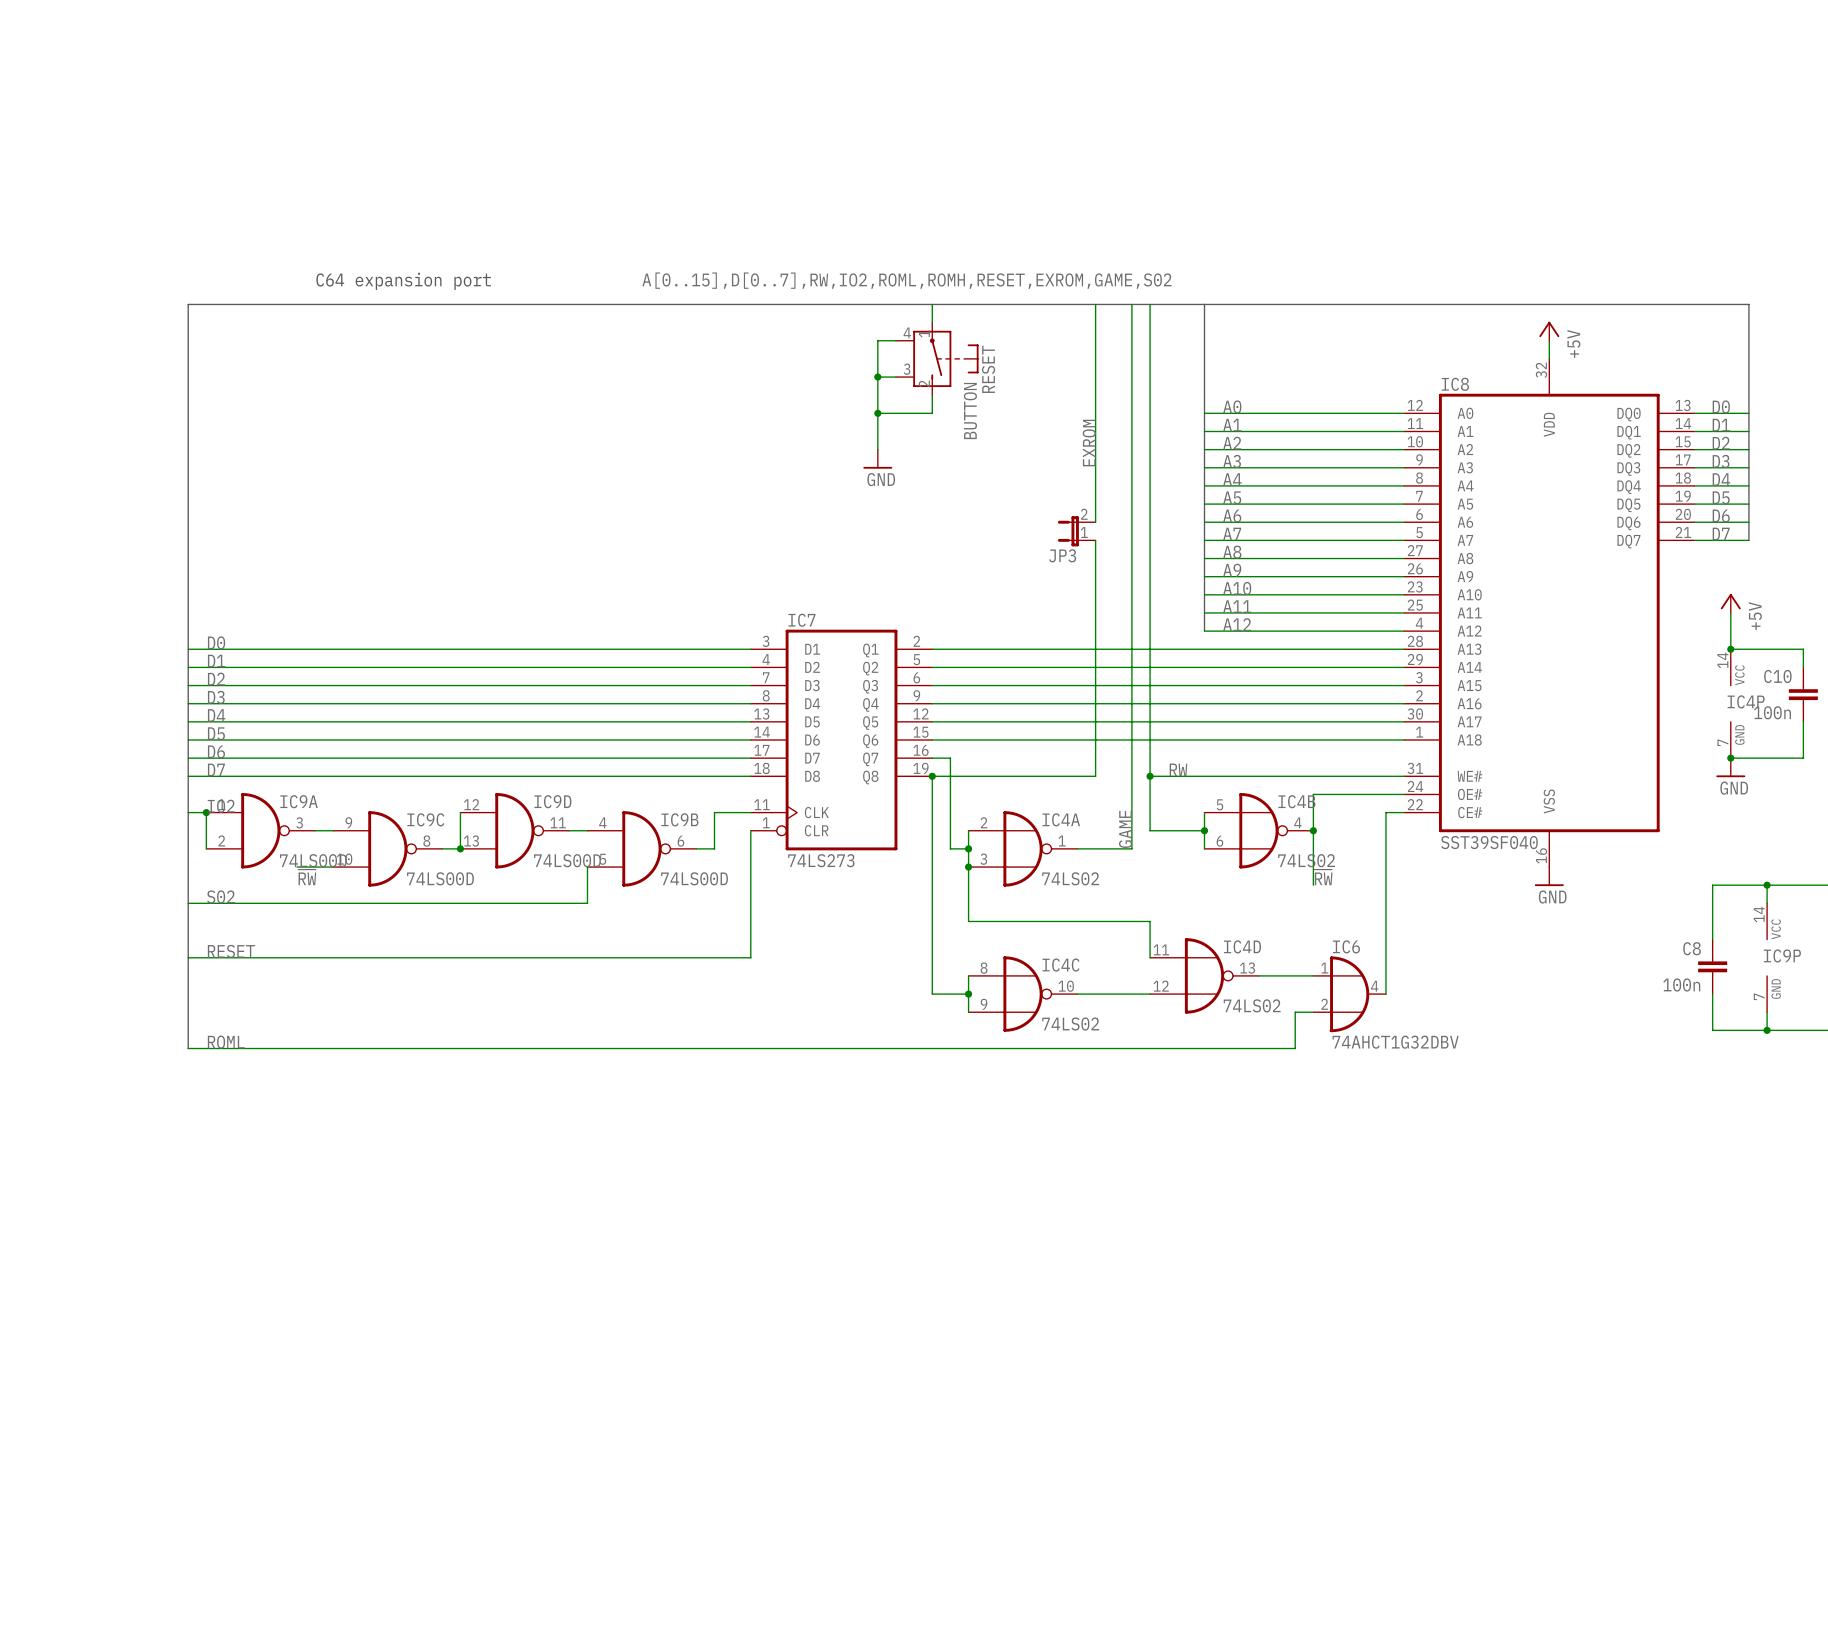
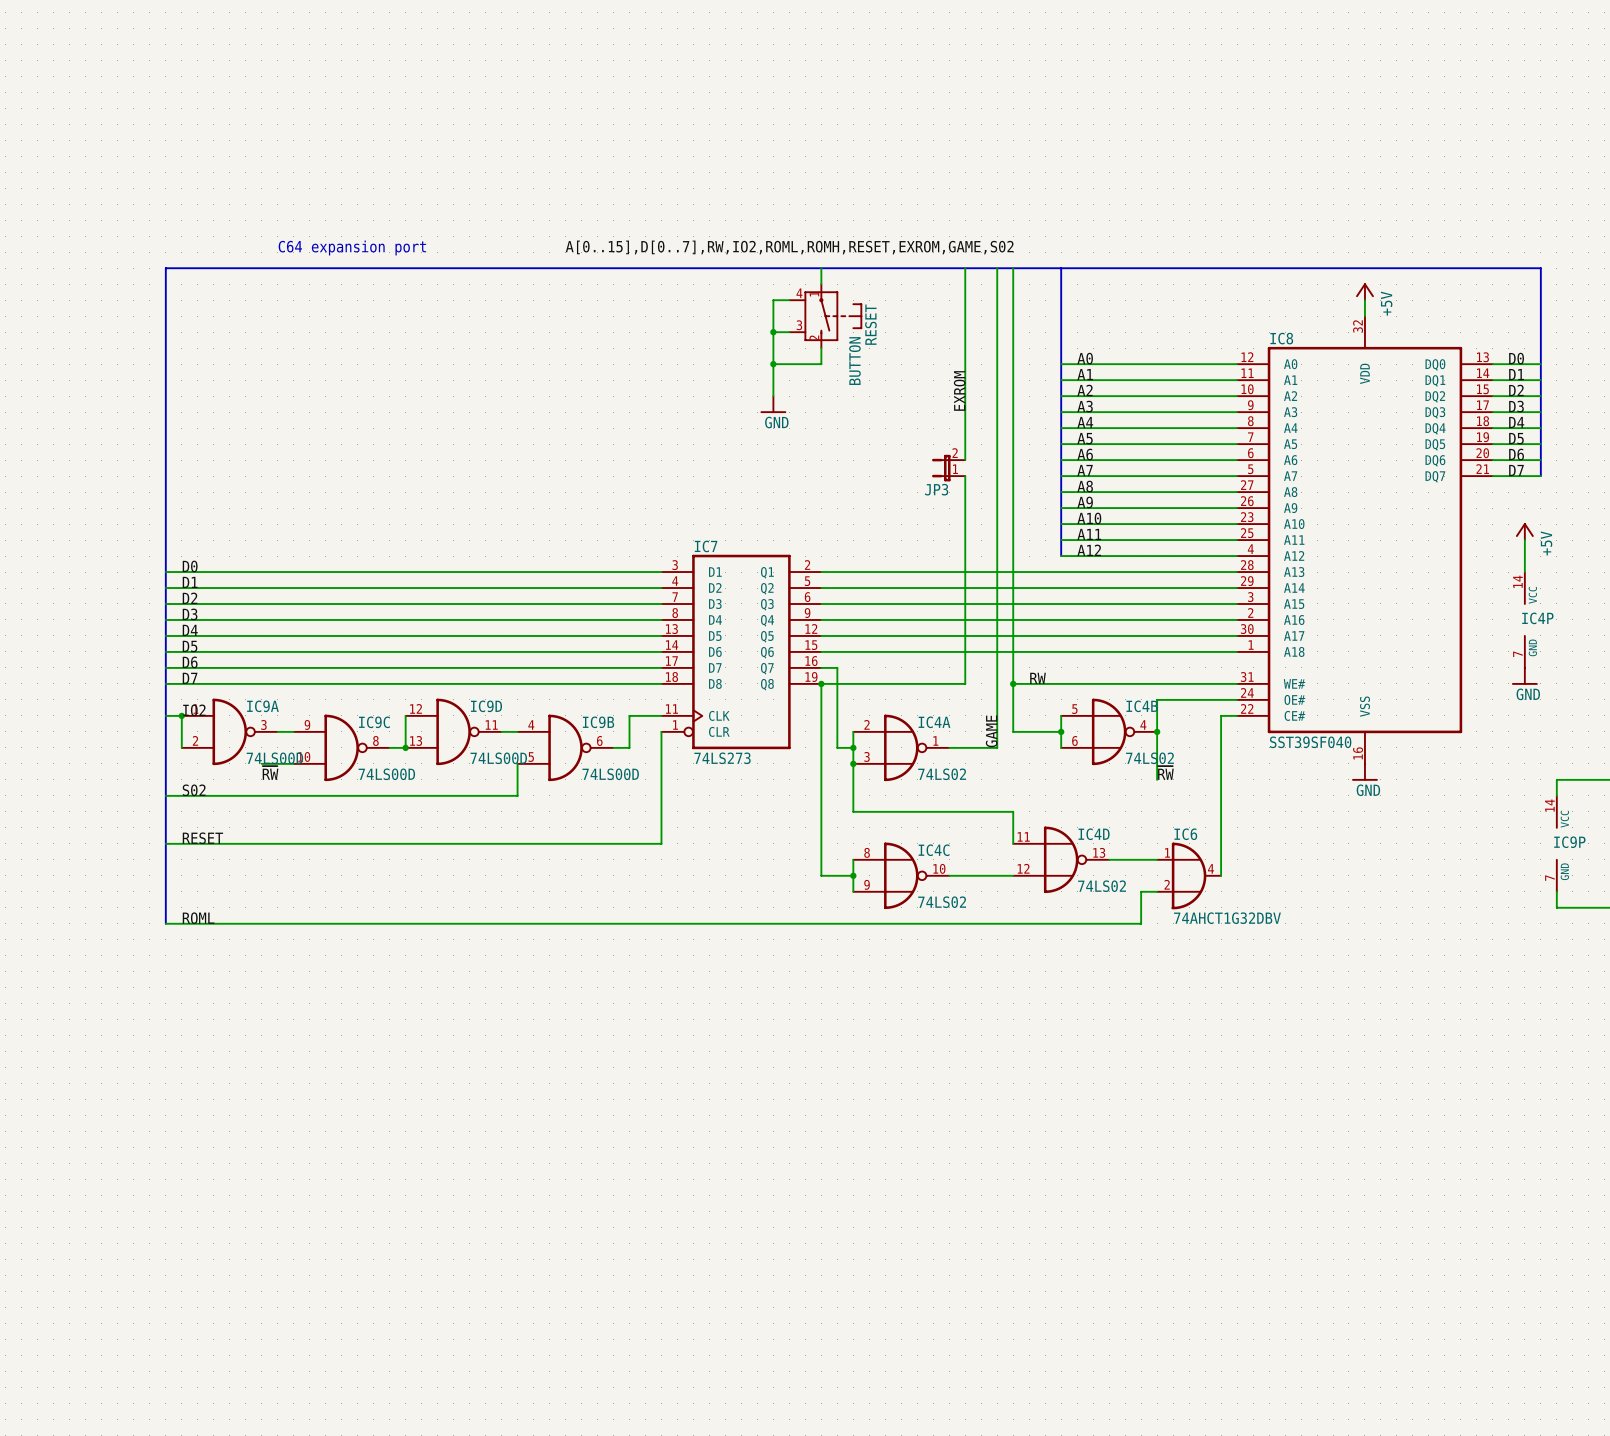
wire: (1730, 649) (1803, 649) (1803, 667) -> none
junction: (1730, 649) -> none
C10: 100n (1803, 694) -> none
wire: (1803, 721) (1803, 758) (1730, 758) -> none
junction: (1730, 758) -> none
wire: (1767, 885) (1712, 885) (1712, 939) -> none
junction: (1767, 885) -> none
C8: 100n (1712, 966) -> none
wire: (1712, 994) (1712, 1030) (1767, 1030) -> none
junction: (1767, 1030) -> none

